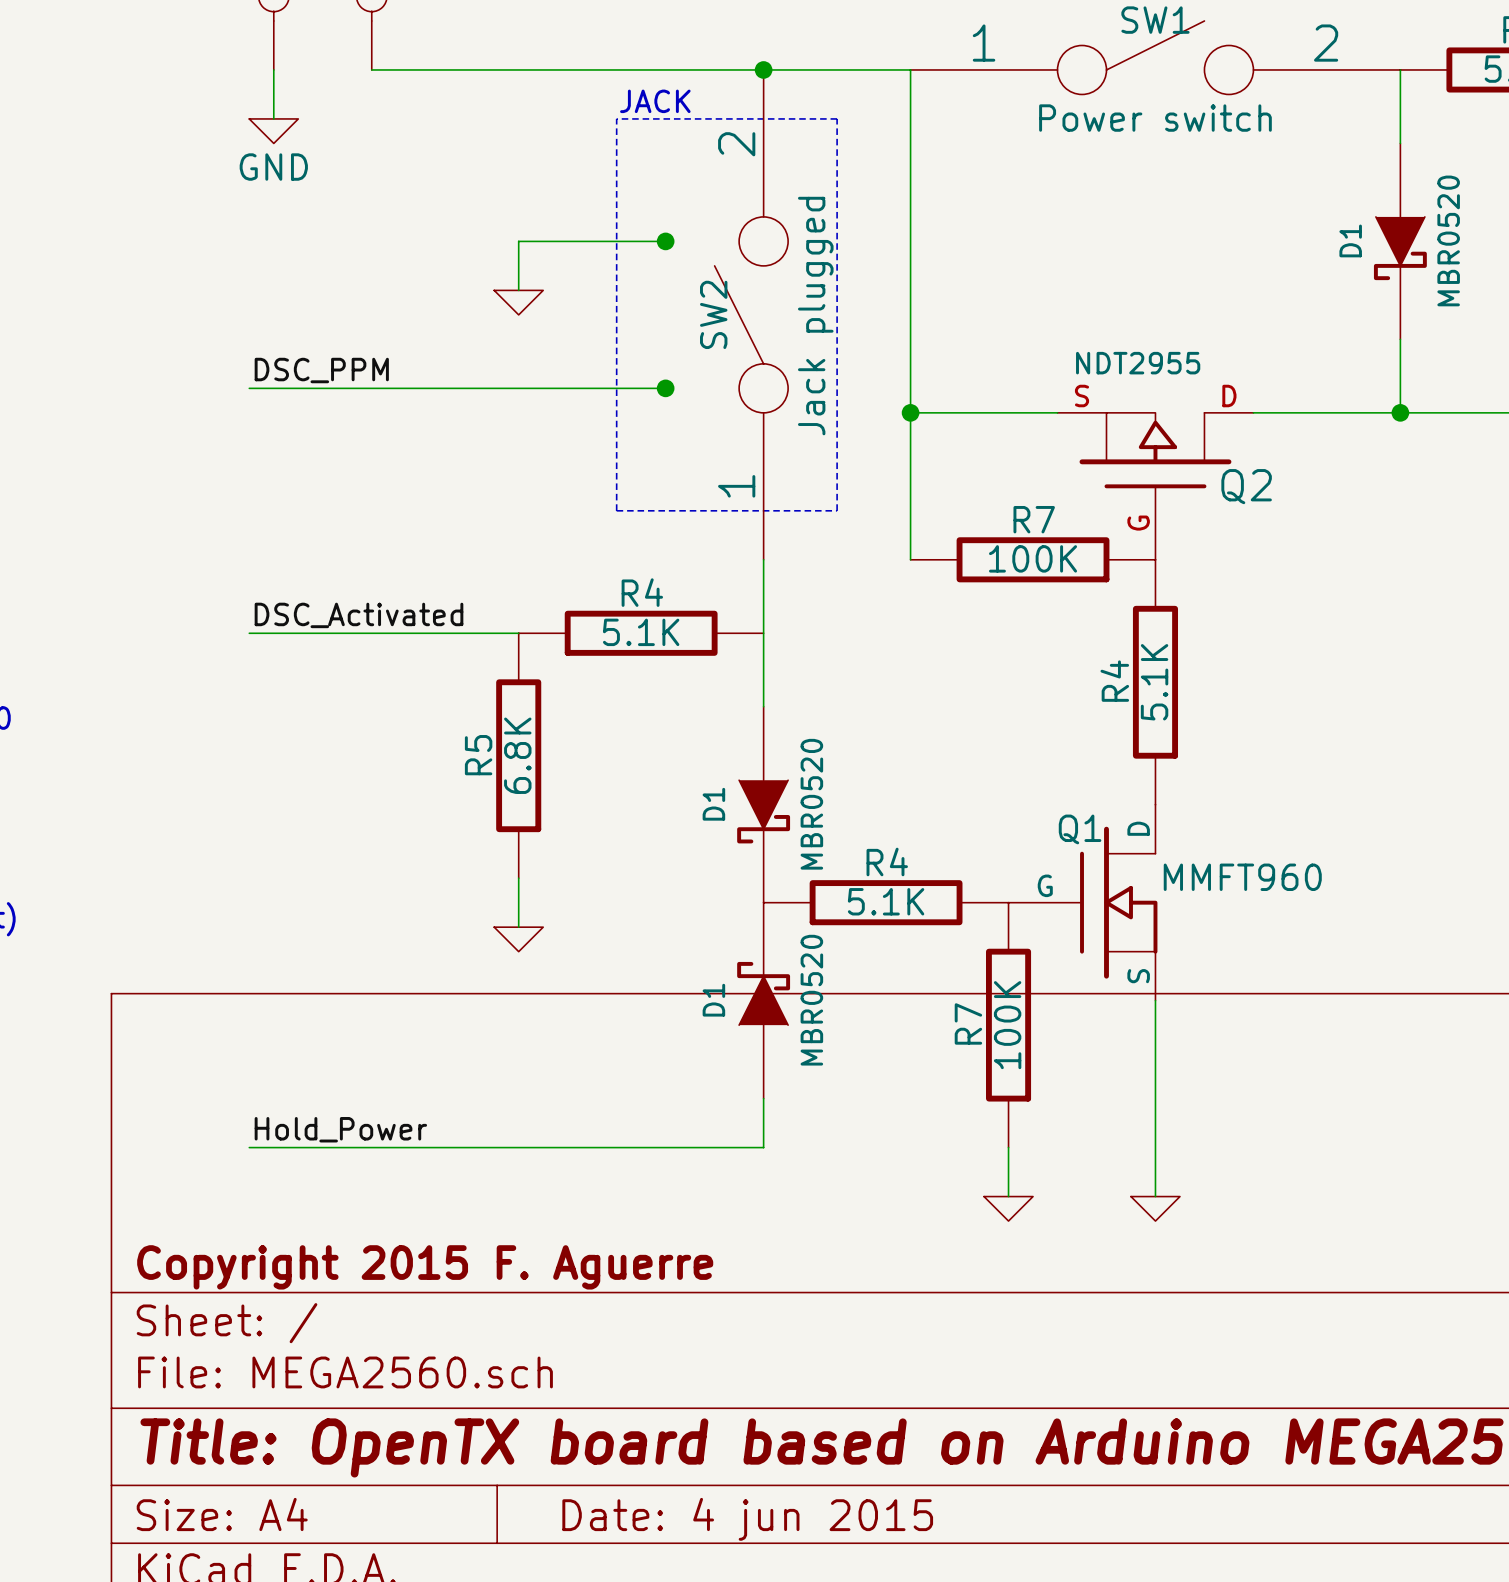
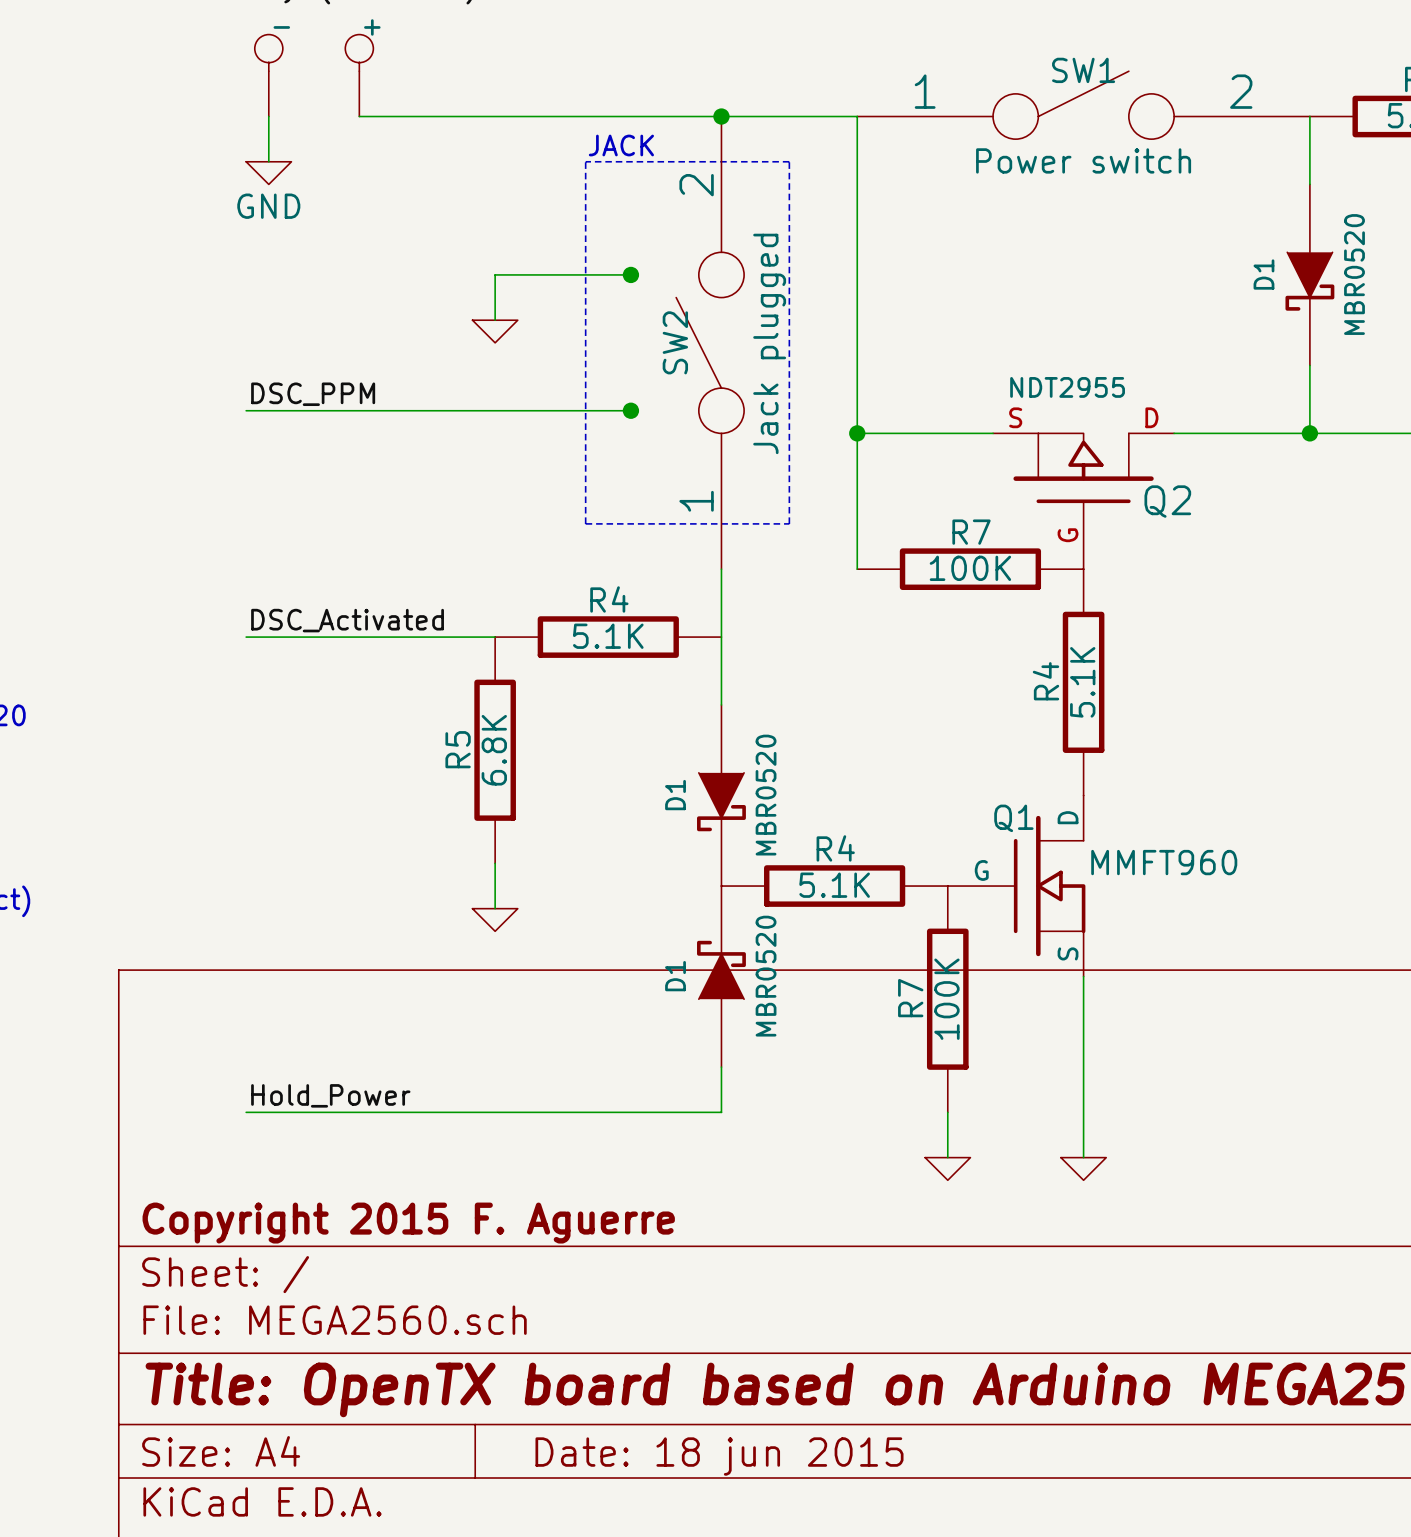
title block: Date: 4 jun 2015 (747, 1519) -> Date: 18 jun 2015 (719, 1456)

